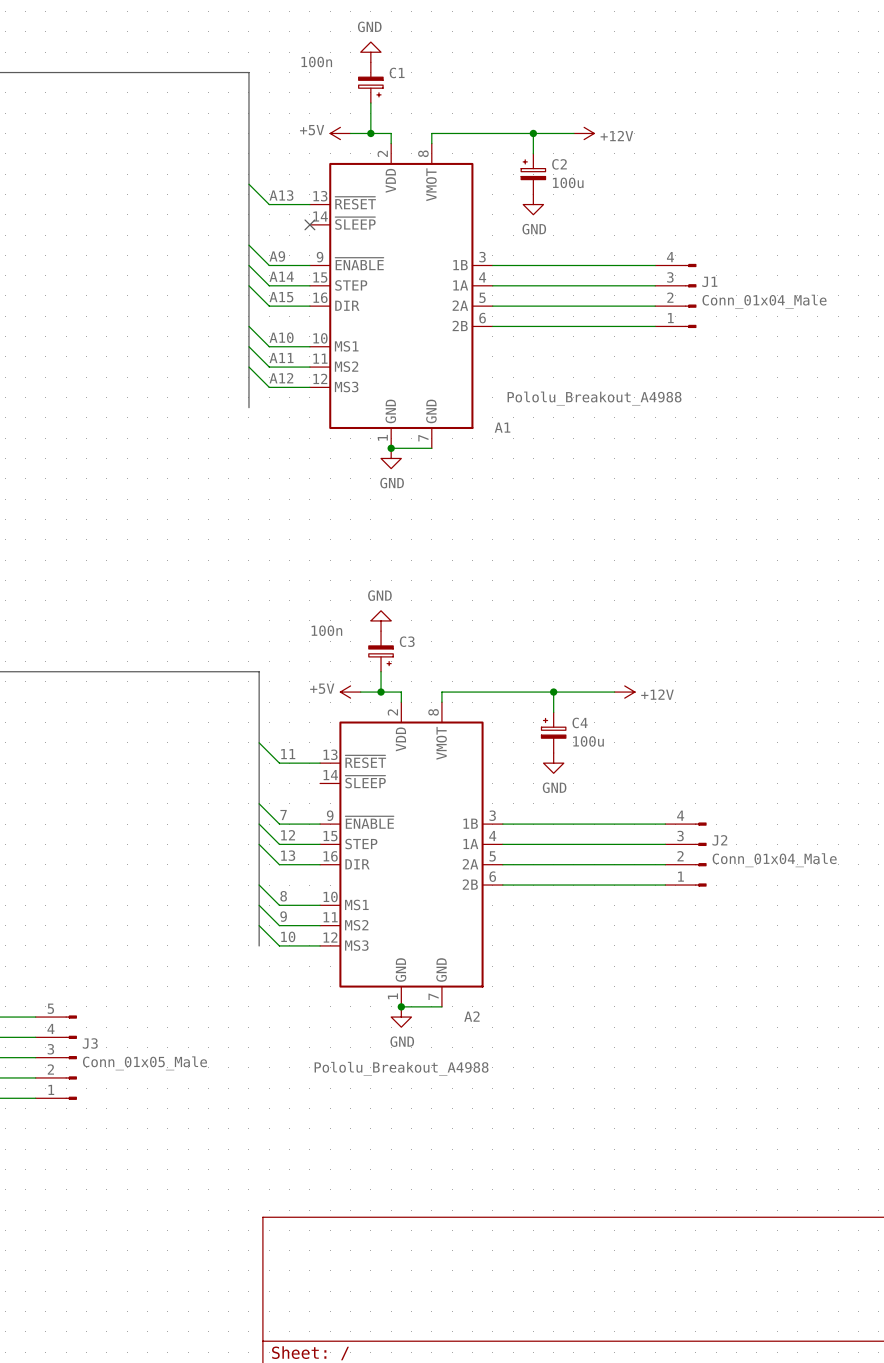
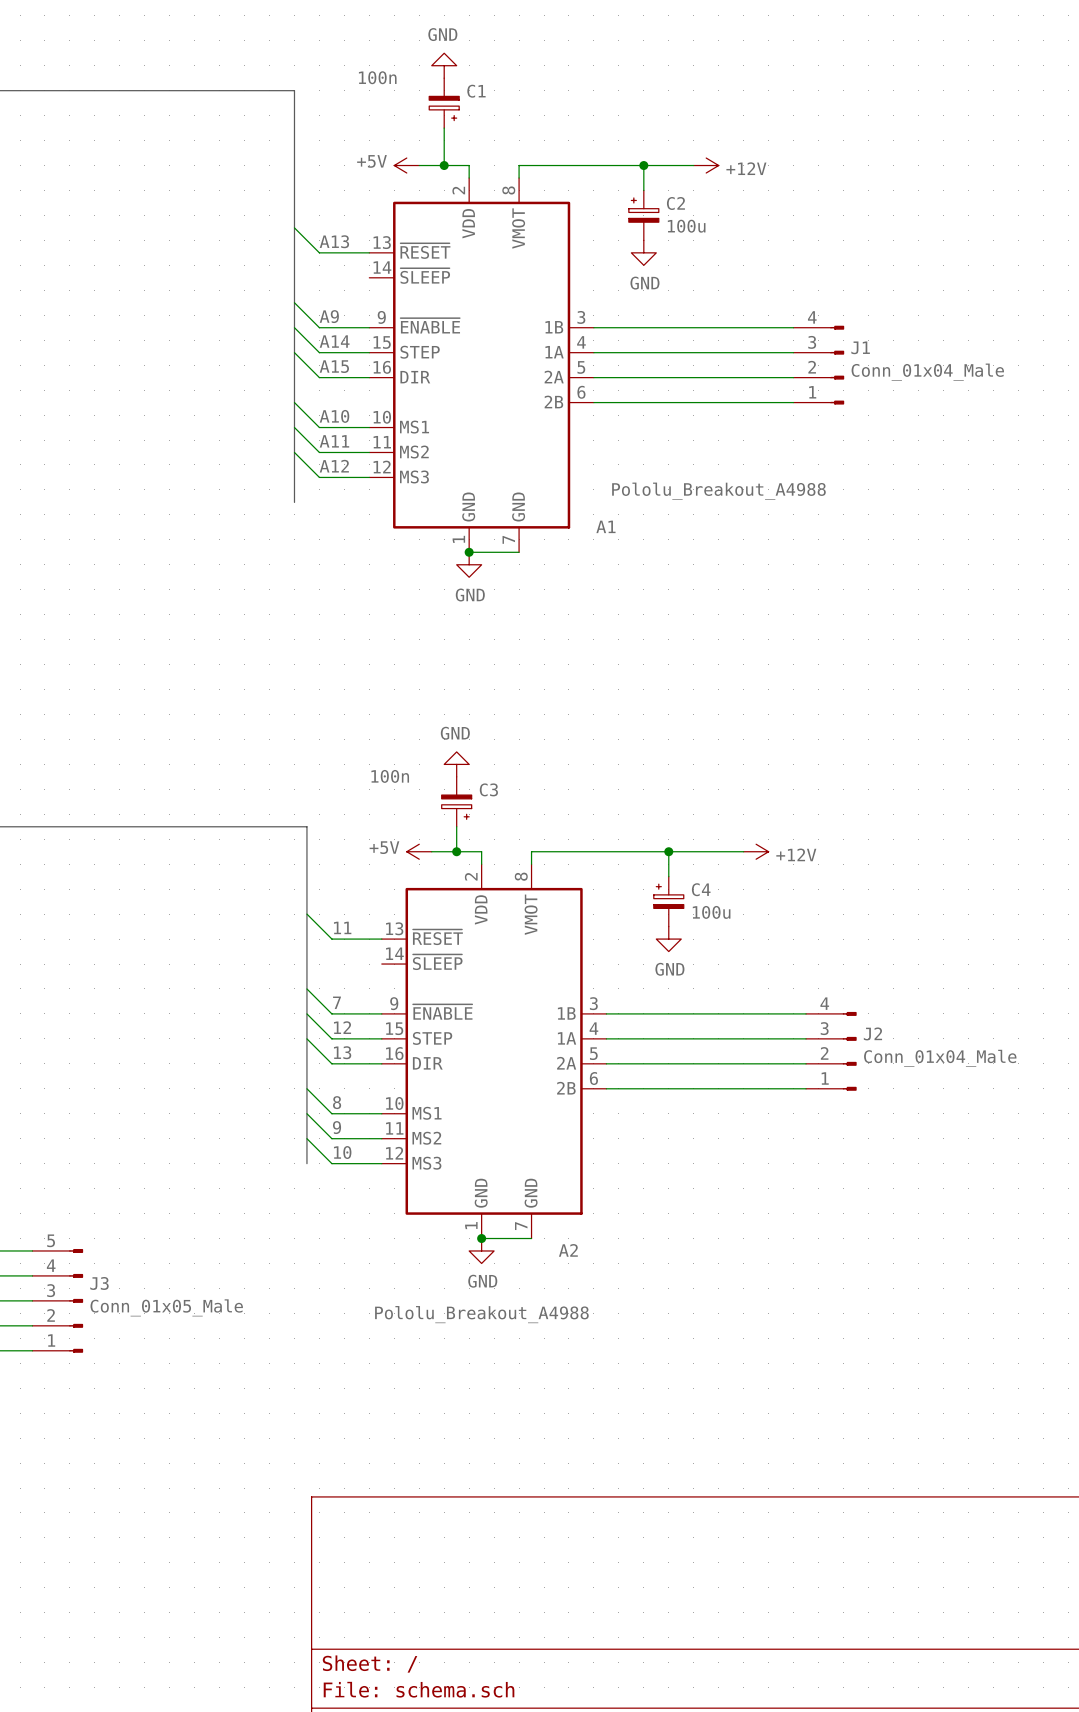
no-connect mark: (309, 224) -> none

